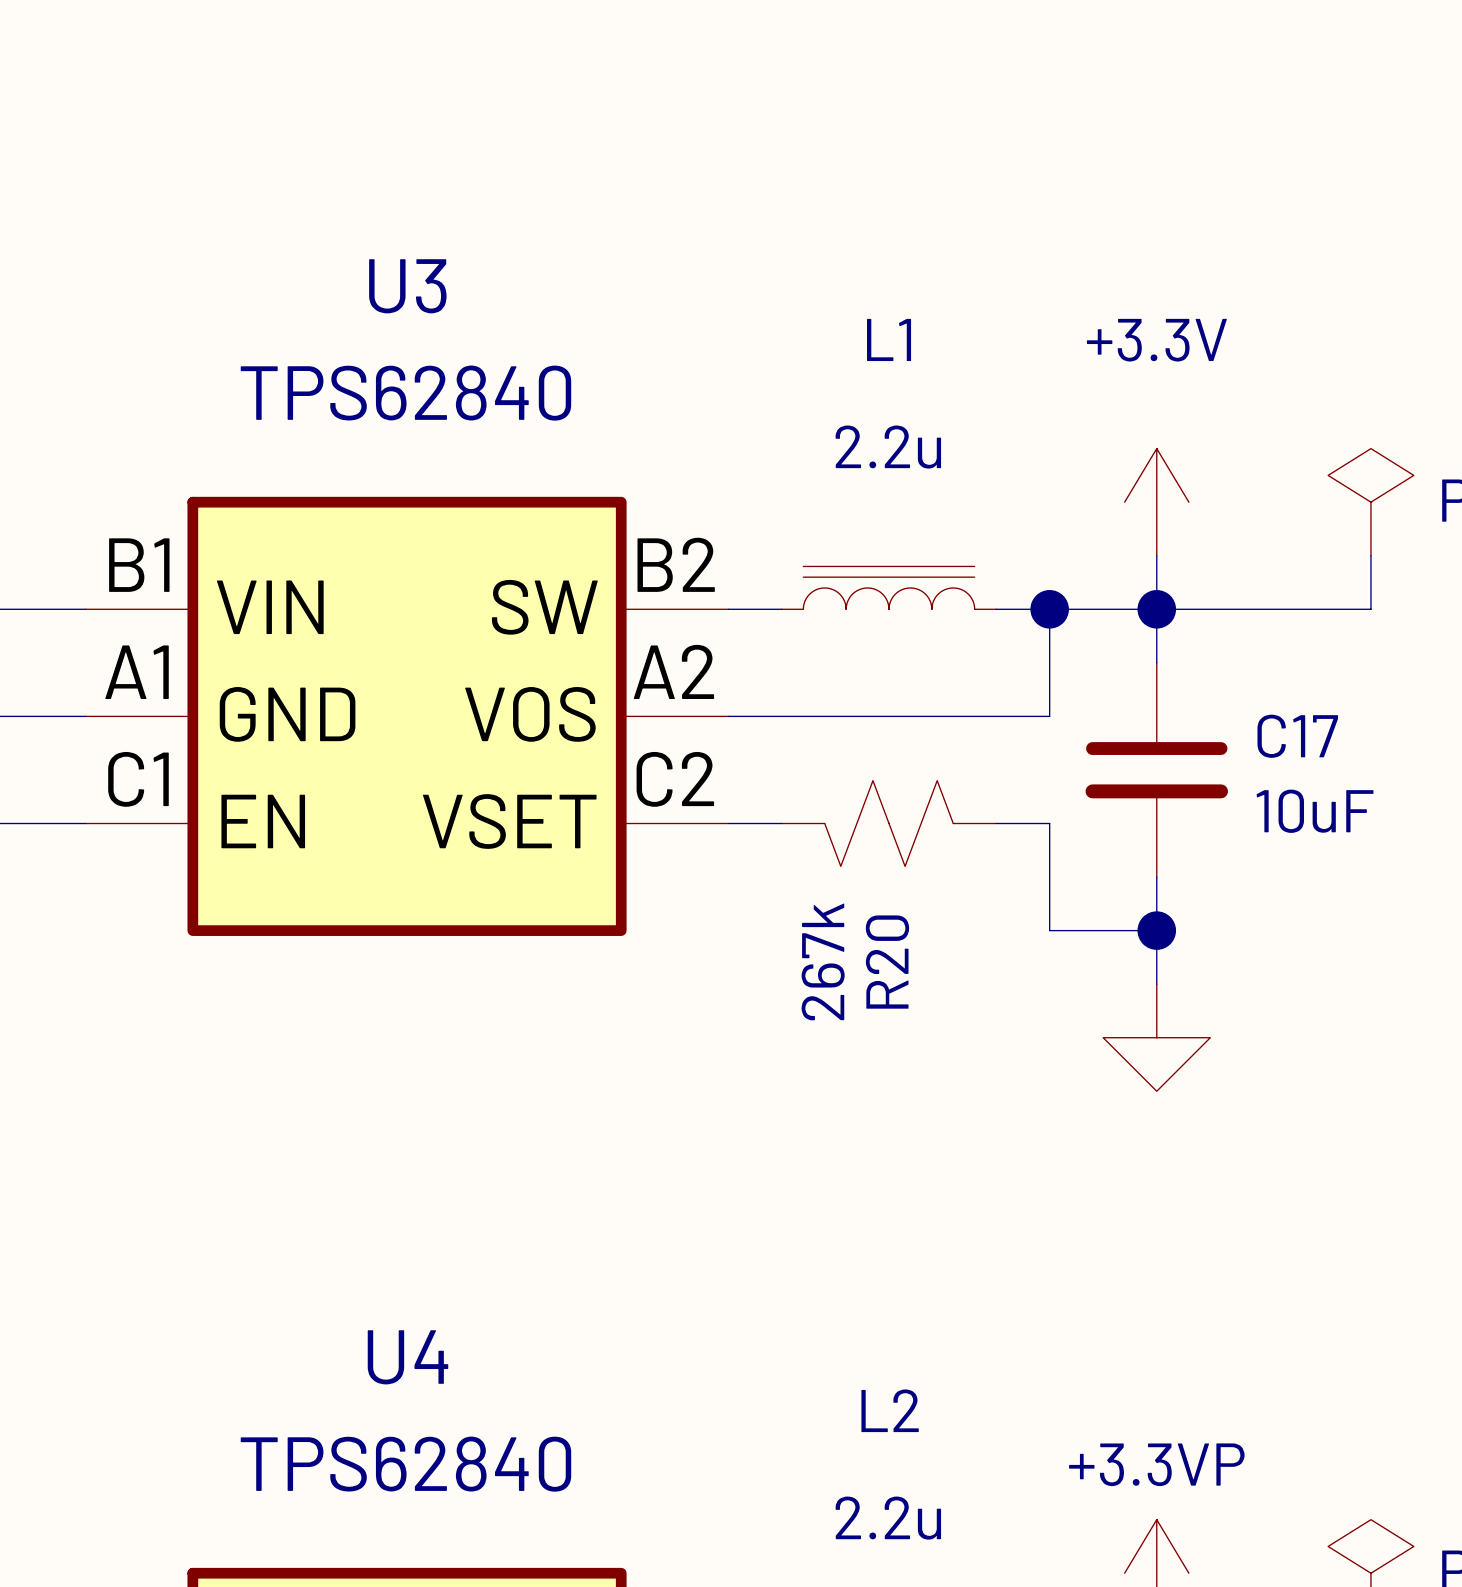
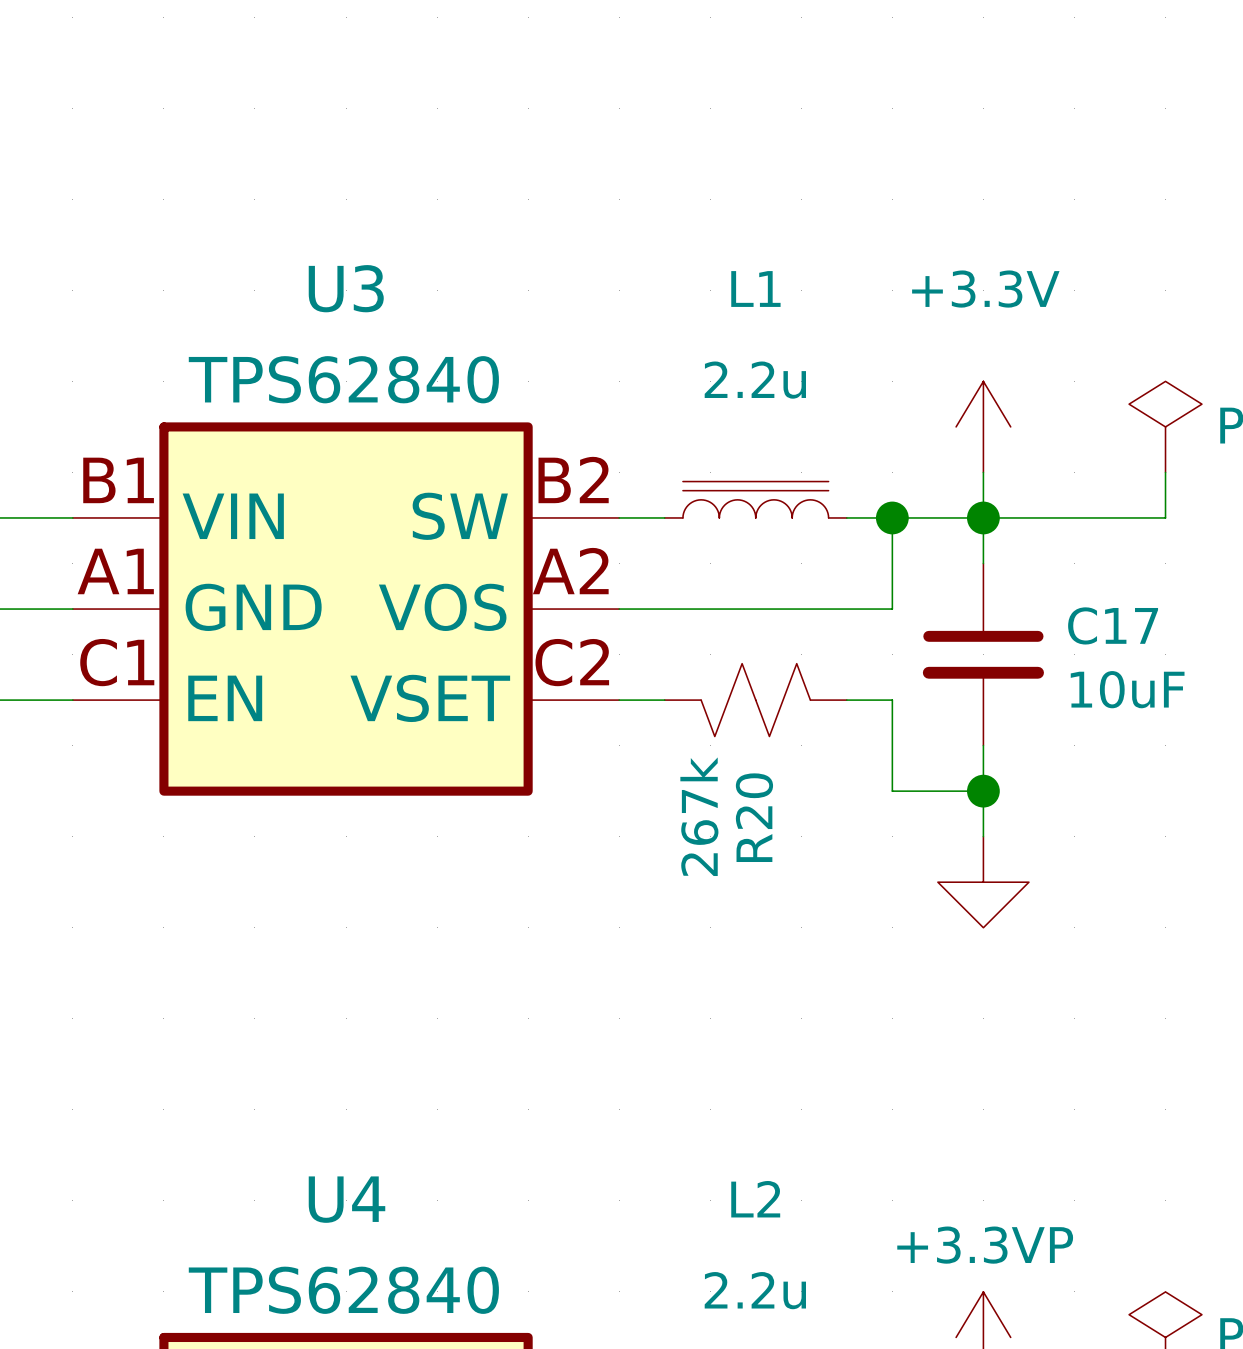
U3 name position: U3 (407, 286) -> U3 (346, 288)
U3 value position: TPS62840 (405, 393) -> TPS62840 (343, 379)
U4 name position: U4 (407, 1357) -> U4 (346, 1199)
U4 value position: TPS62840 (405, 1464) -> TPS62840 (343, 1290)

